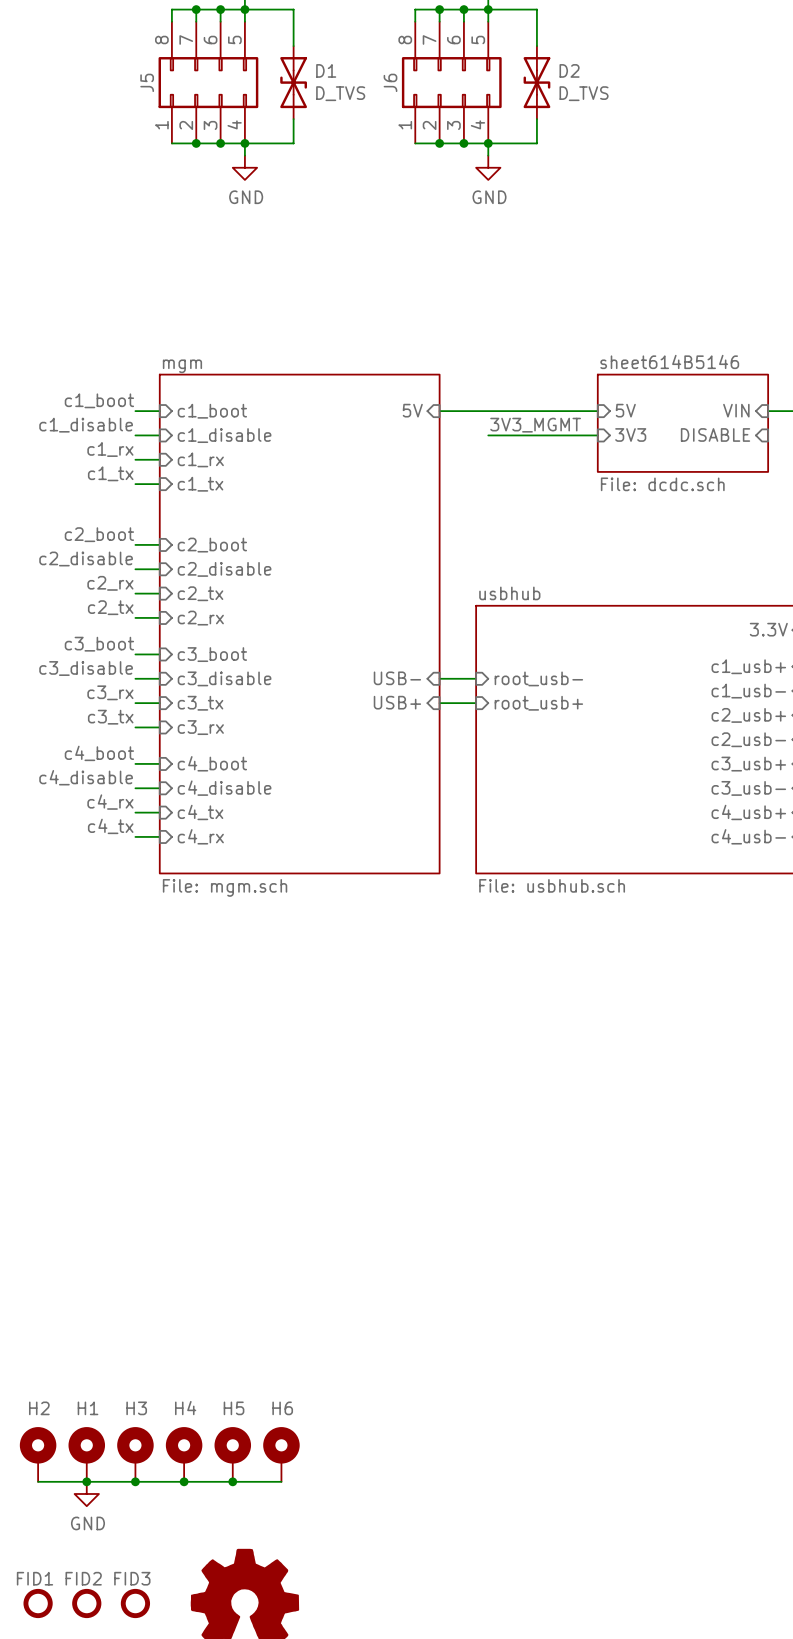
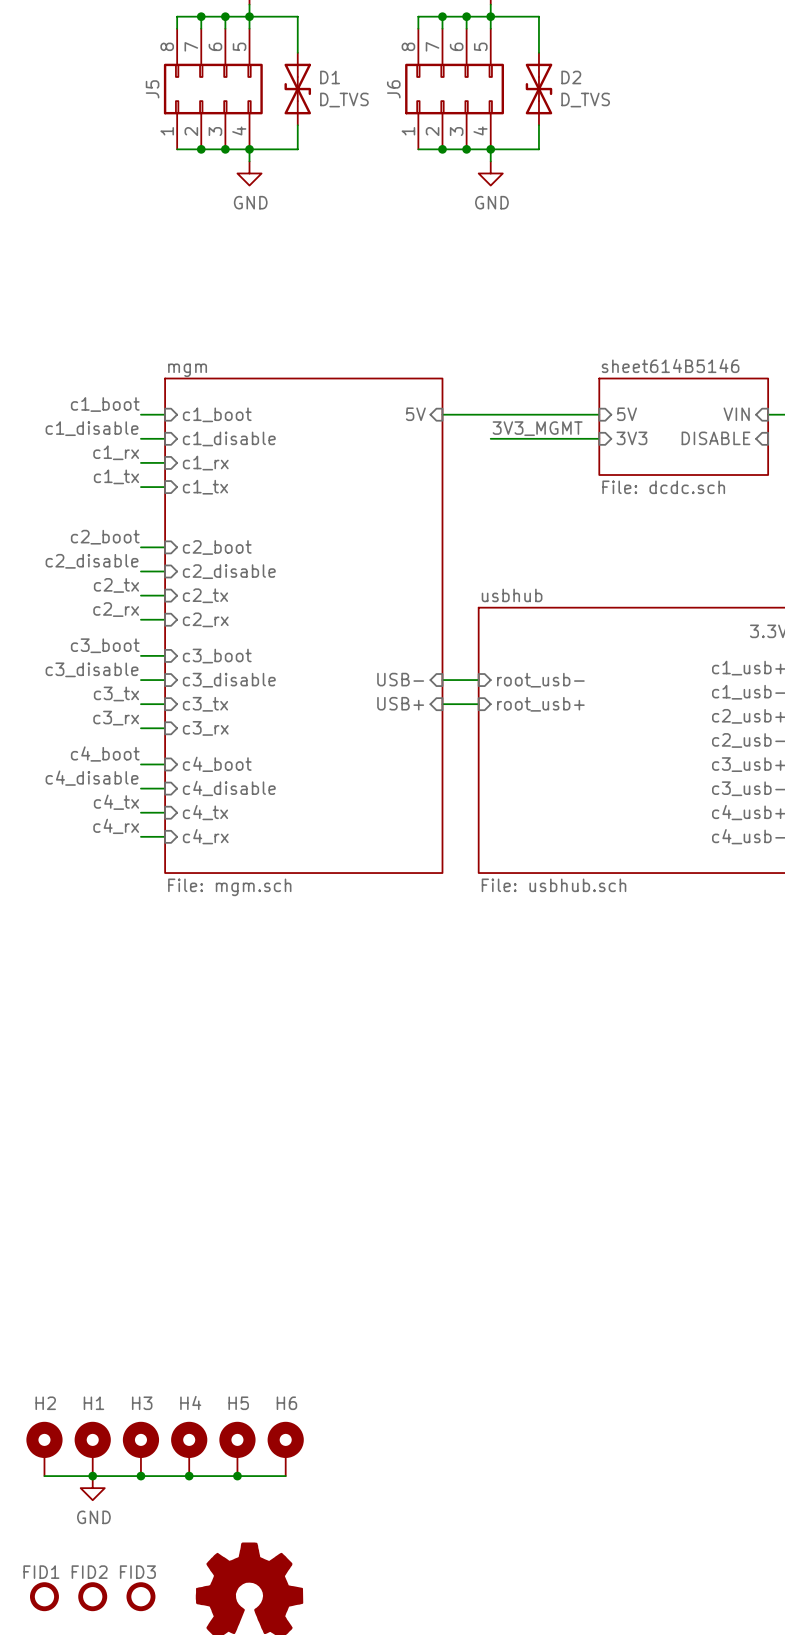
label: c2_rx (110, 583) -> c2_tx (116, 585)
label: c2_tx (110, 607) -> c2_rx (116, 609)
label: c3_rx (110, 692) -> c3_tx (116, 693)
label: c3_tx (110, 717) -> c3_rx (116, 718)
label: c4_rx (110, 802) -> c4_tx (116, 802)
label: c4_tx (110, 826) -> c4_rx (116, 826)

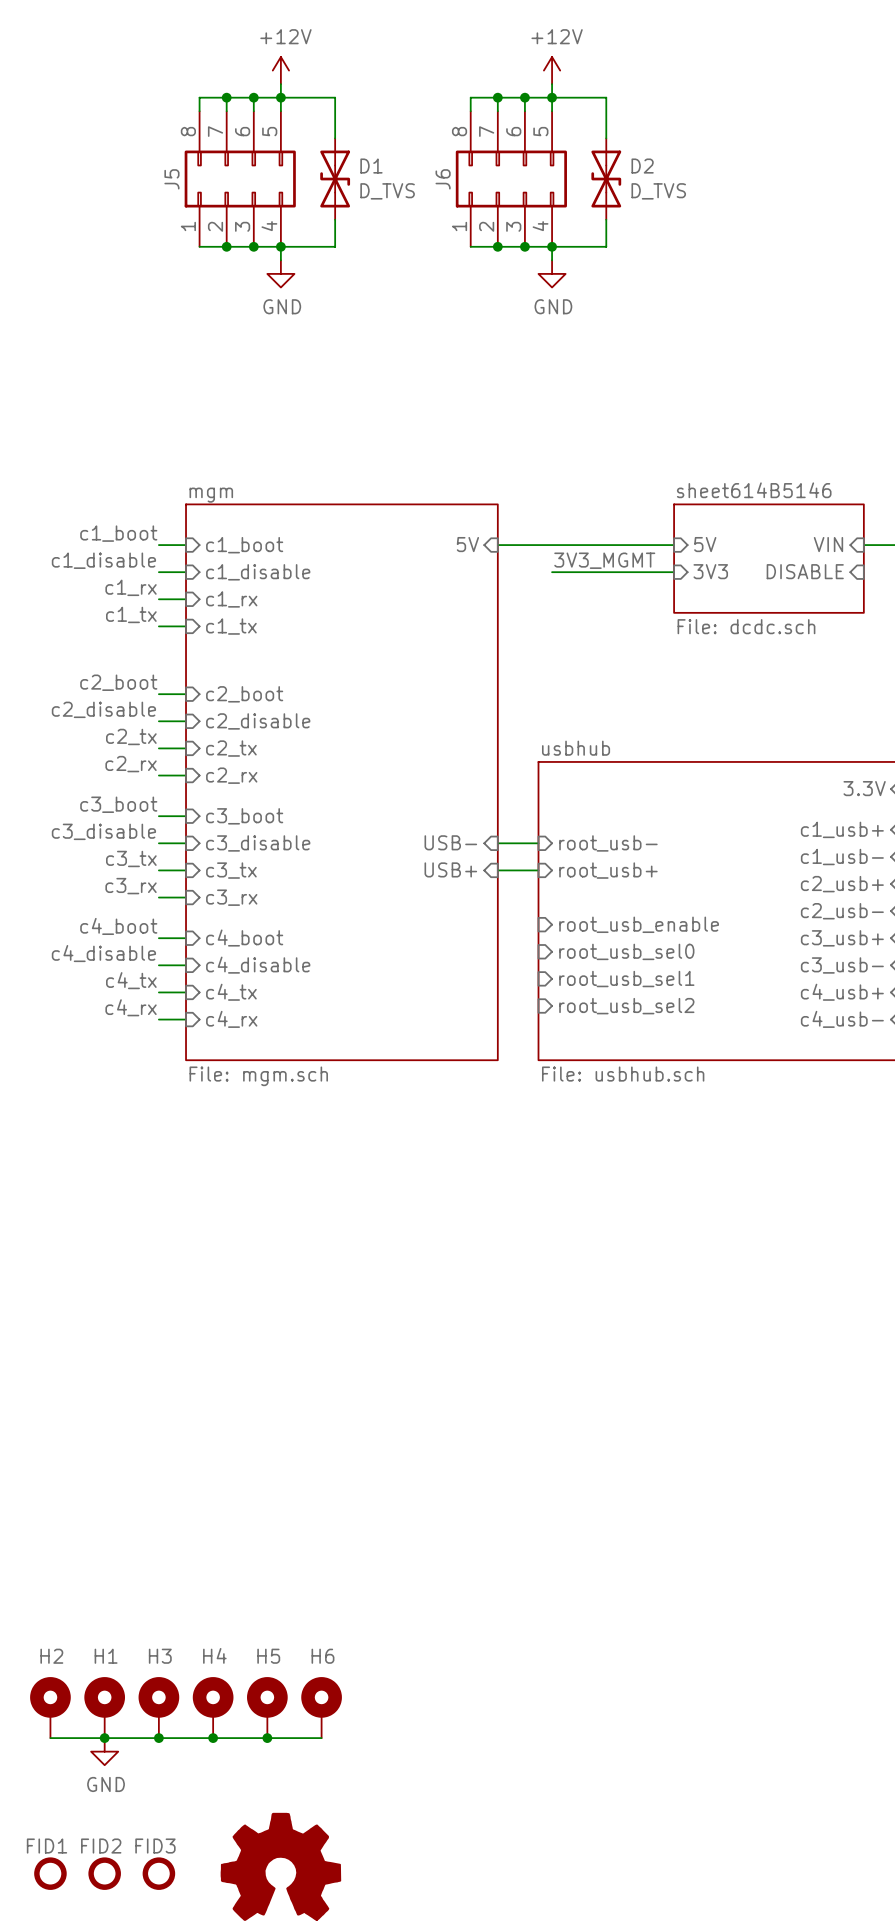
sheet pin: none -> root_usb_enable (639, 924)
sheet pin: none -> root_usb_sel0 (626, 951)
sheet pin: none -> root_usb_sel1 (626, 979)
sheet pin: none -> root_usb_sel2 (626, 1006)

